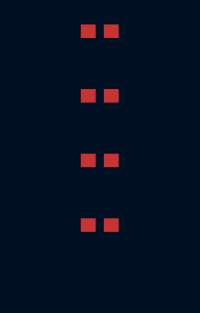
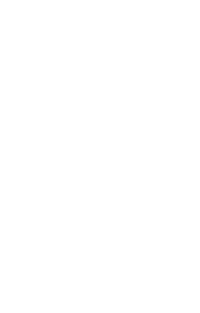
part: (99, 31) -> none
part: (99, 95) -> none
part: (99, 160) -> none
part: (99, 225) -> none

